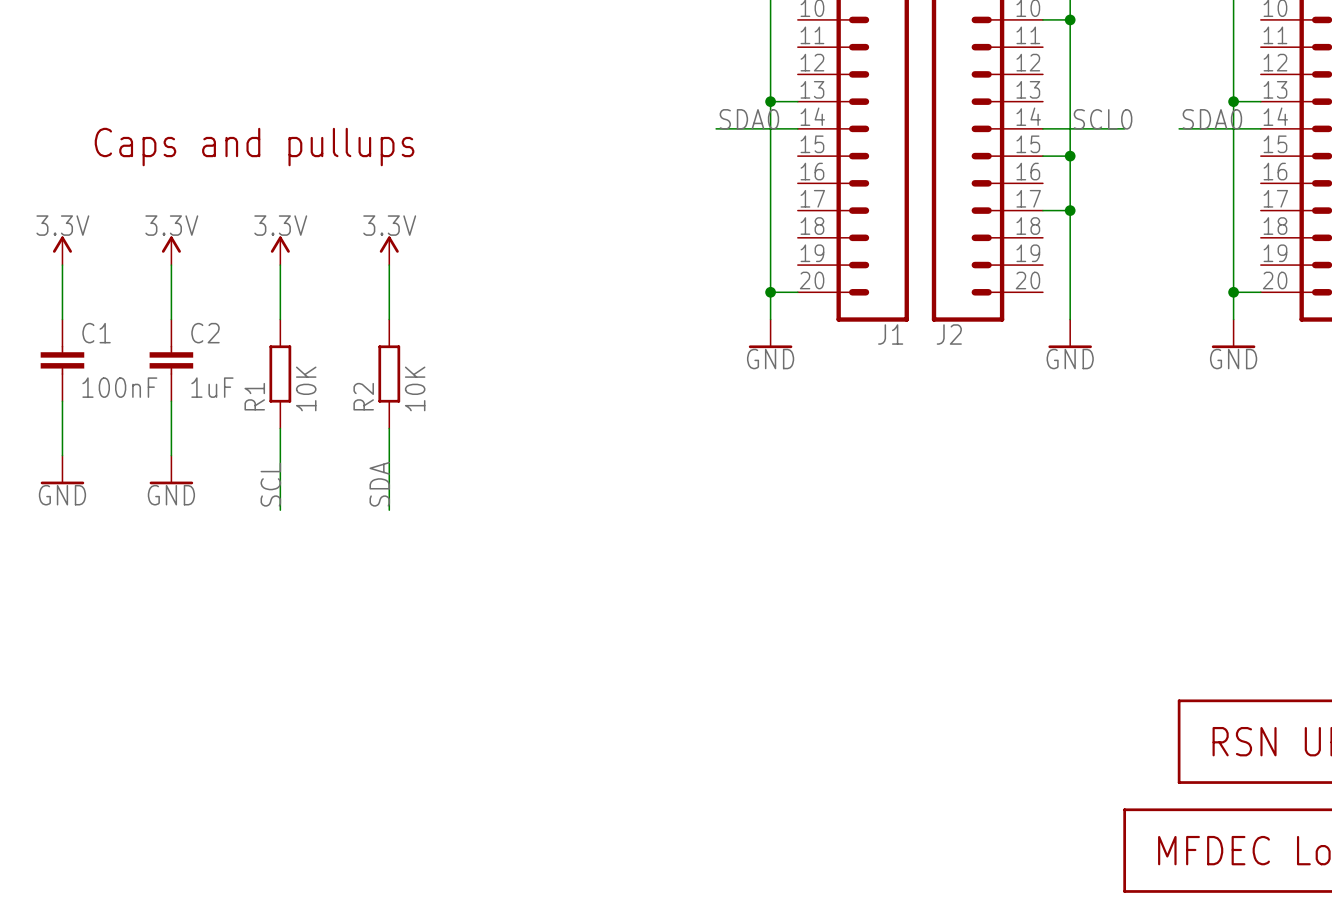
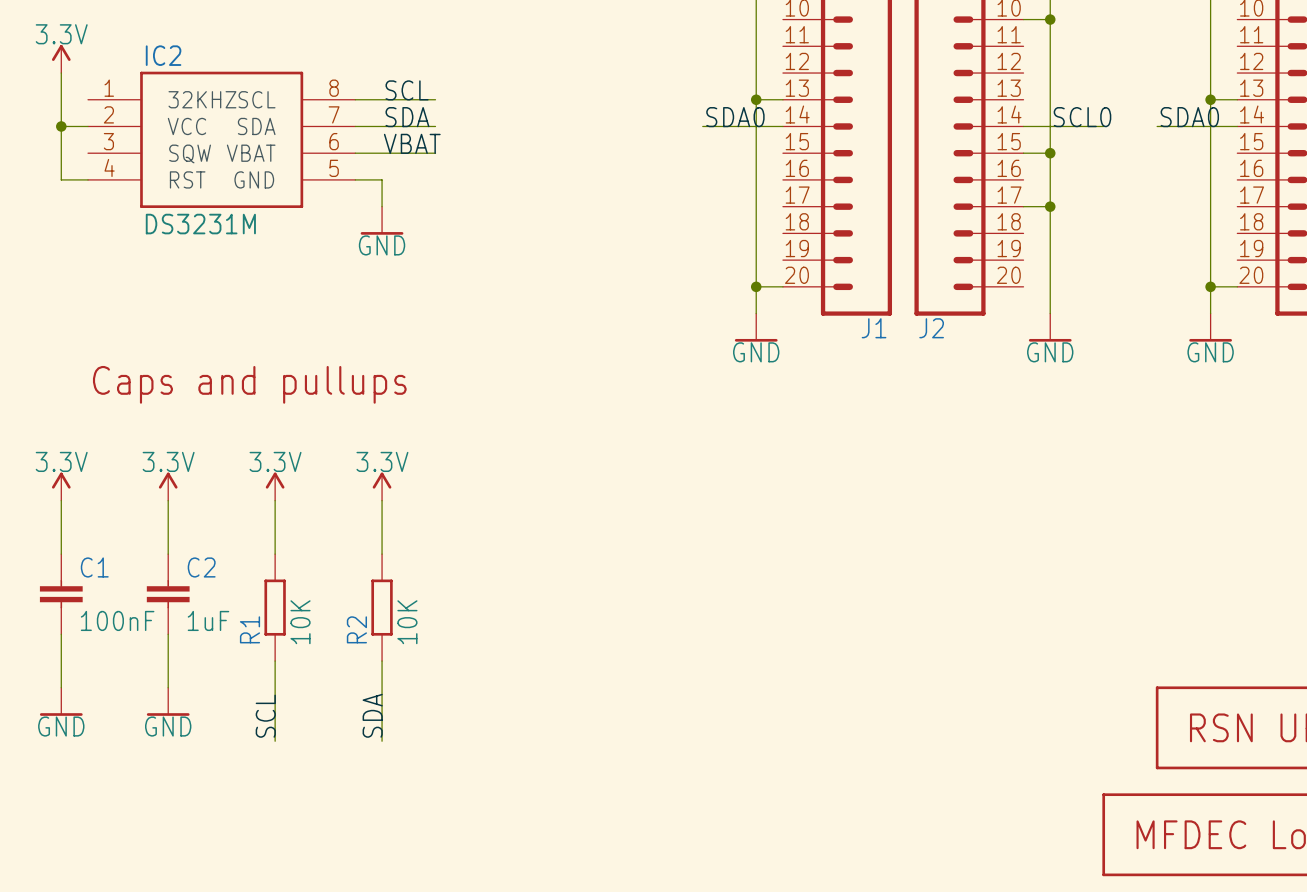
power symbol: none -> 3.3V (61, 58)
wire: none -> (61, 73) (61, 179) (88, 179)
label: none -> SCL (407, 90)
wire: none -> (355, 99) (435, 99)
label: none -> SDA (407, 117)
wire: none -> (61, 126) (88, 126)
junction: none -> (61, 126)
wire: none -> (355, 126) (435, 126)
IC2: none -> DS3231M (221, 139)
label: none -> VBAT (412, 143)
text position: Caps and pullups (254, 147) -> Caps and pullups (249, 384)
wire: none -> (355, 153) (435, 153)
wire: none -> (355, 179) (382, 179) (382, 206)
power symbol: none -> GND (382, 220)
power symbol: 3.3V (62, 250) -> none
power symbol: 3.3V (171, 250) -> none
power symbol: 3.3V (280, 250) -> none
power symbol: 3.3V (389, 250) -> none
wire: (62, 265) (62, 319) -> (61, 500) (61, 554)
wire: (171, 265) (171, 319) -> (168, 500) (168, 554)
wire: (280, 265) (280, 319) -> none
wire: (389, 265) (389, 319) -> none
C1 position: (62, 360) -> (61, 594)
C2 position: (171, 360) -> (168, 594)
R1 position: (280, 374) -> (275, 607)
R2 position: (389, 374) -> (382, 607)
wire: (62, 401) (62, 455) -> (61, 634) (61, 687)
wire: (171, 401) (171, 455) -> (168, 634) (168, 687)
wire: (280, 428) (280, 510) -> (275, 554) (275, 500)
wire: (389, 428) (389, 510) -> (382, 554) (382, 500)
power symbol: GND (62, 470) -> none
power symbol: GND (171, 470) -> none
label: SCL (270, 484) -> none
label: SDA (379, 484) -> none
power symbol: none -> 3.3V (61, 486)
power symbol: none -> 3.3V (168, 486)
power symbol: none -> 3.3V (275, 486)
power symbol: none -> 3.3V (382, 486)
wire: none -> (275, 661) (275, 741)
wire: none -> (382, 661) (382, 741)
power symbol: none -> GND (61, 701)
power symbol: none -> GND (168, 701)
label: none -> SCL (265, 716)
label: none -> SDA (372, 715)

